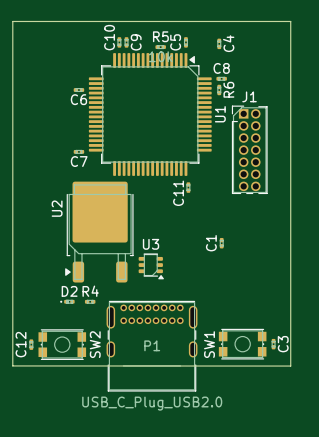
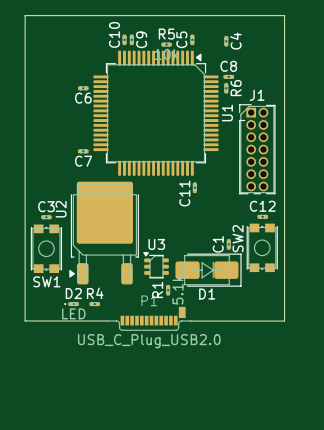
board edge: (12, 21) (12, 365) (290, 366) (290, 21) (12, 21) -> none
U3 rotation: 0° (151, 266) -> 180° (156, 265)
D1: none -> (208, 270)
R1: none -> 5.1k (168, 290)
P1 footprint: [106, 300, 198, 392] -> [106, 306, 192, 331]
D2 value: none -> LED (73, 313)
board edge: none -> (107, 320) (25, 320) (25, 15) (284, 15) (284, 321) (189, 321)
C12 rotation: 0° (31, 344) -> 90° clockwise (262, 216)
C12 position: (31, 344) -> (262, 216)
SW2 rotation: 0° (62, 344) -> 90° clockwise (262, 247)
SW2 position: (62, 344) -> (262, 247)
SW2 name position: SW2 (95, 344) -> SW2 (238, 238)
SW1 name position: SW1 (209, 344) -> SW1 (46, 281)
SW1 rotation: 0° (242, 344) -> 90° clockwise (46, 248)
SW1 position: (242, 344) -> (46, 248)
C3 rotation: 0° (273, 344) -> 90° clockwise (46, 217)
C3 position: (273, 344) -> (46, 217)
P1 value position: USB_C_Plug_USB2.0 (152, 403) -> USB_C_Plug_USB2.0 (149, 341)

